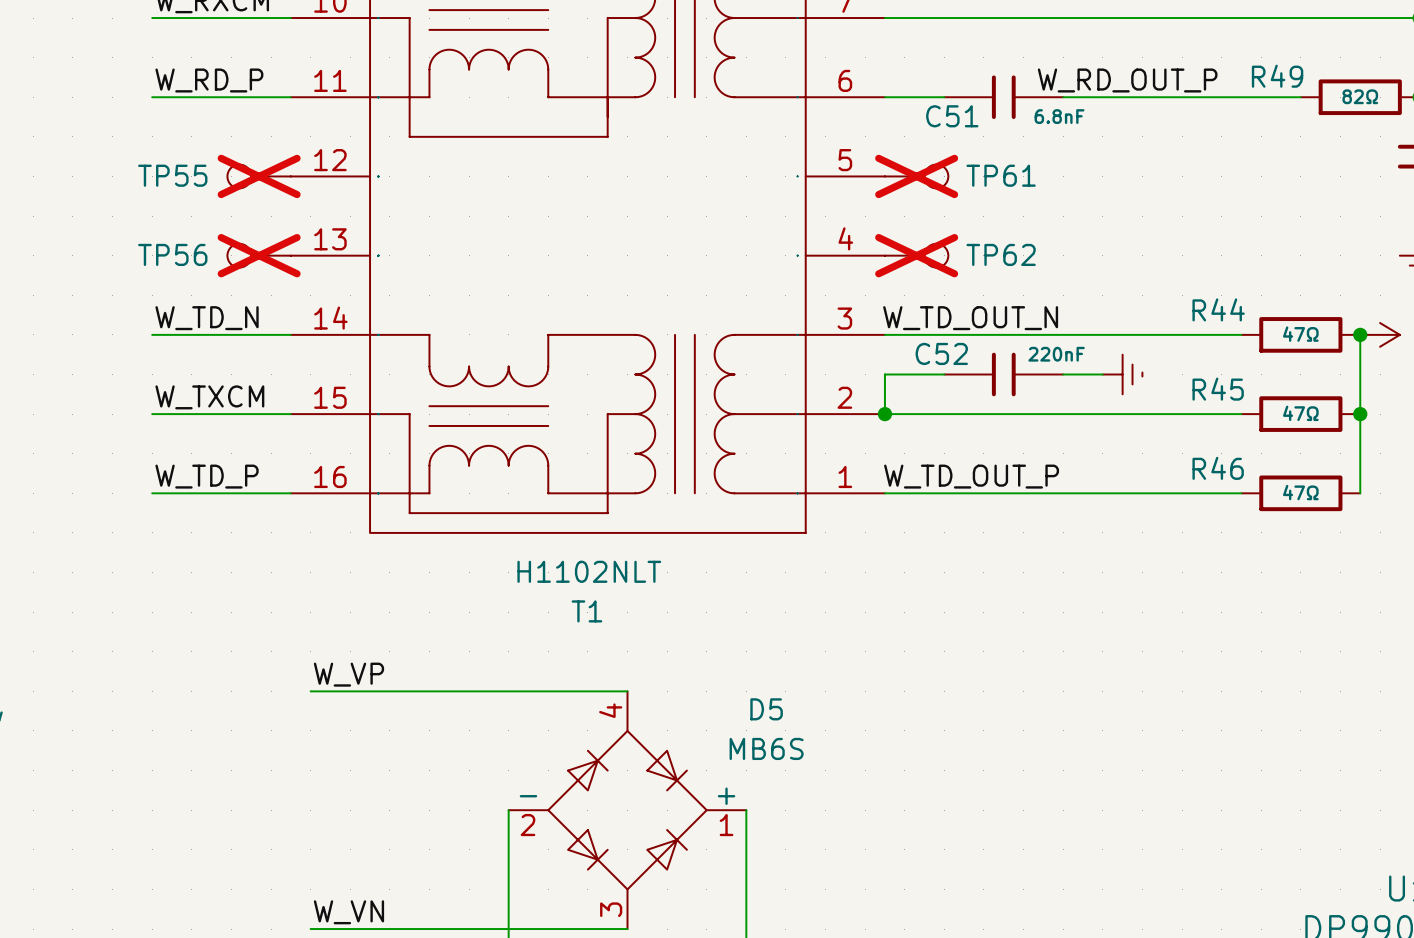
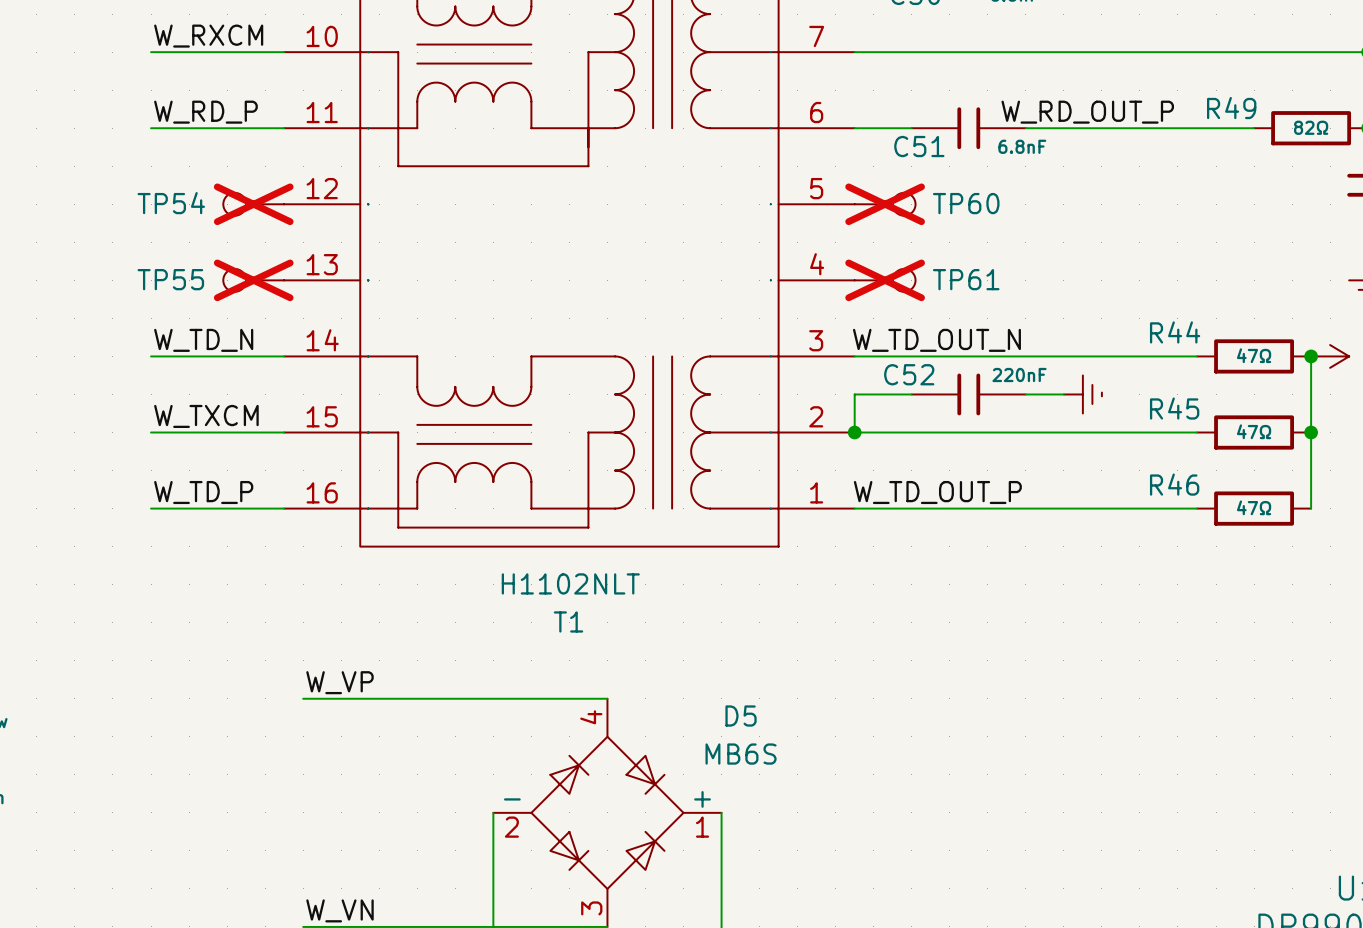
TP55 name: TP55 (172, 175) -> TP54 (171, 203)
TP61 name: TP61 (1001, 175) -> TP60 (966, 203)
TP56 name: TP56 (172, 254) -> TP55 (170, 279)
TP62 name: TP62 (1001, 254) -> TP61 (966, 279)

